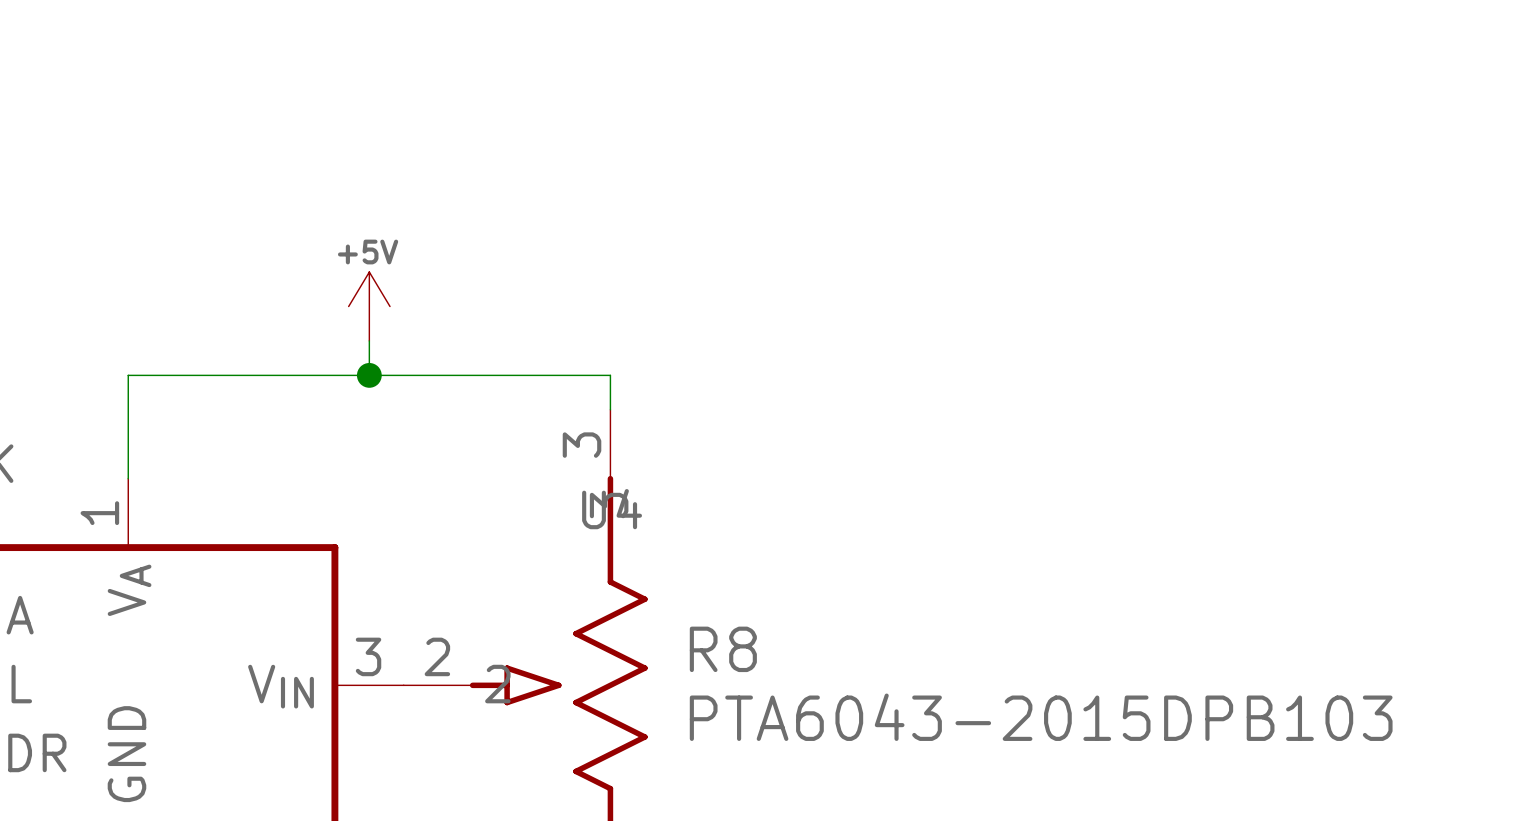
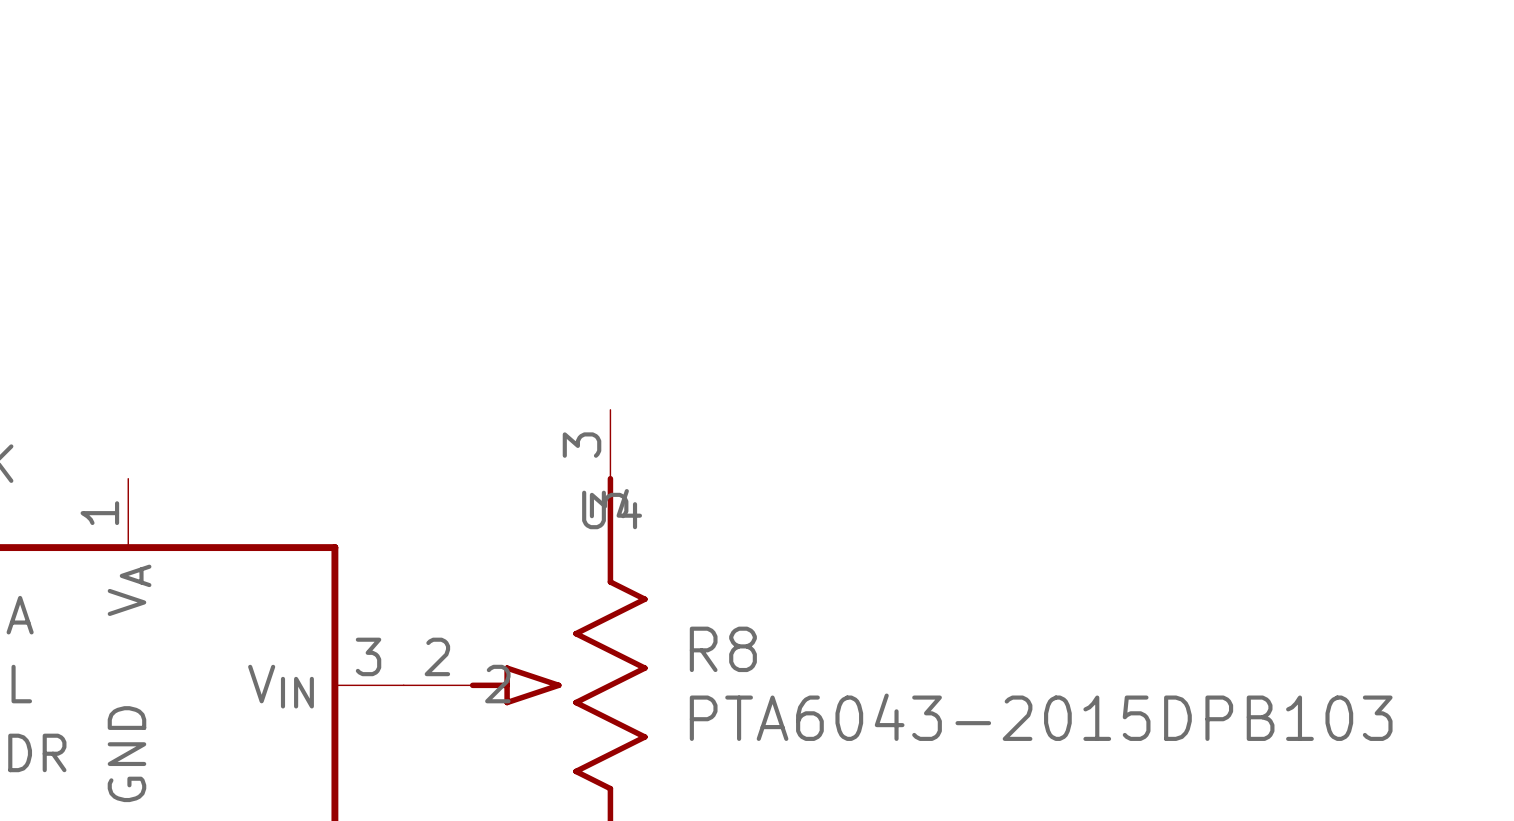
power symbol: +5V (369, 306) -> none
wire: (369, 340) (369, 375) -> none
junction: (369, 375) -> none
wire: (610, 409) (610, 375) (128, 375) (128, 478) -> none

